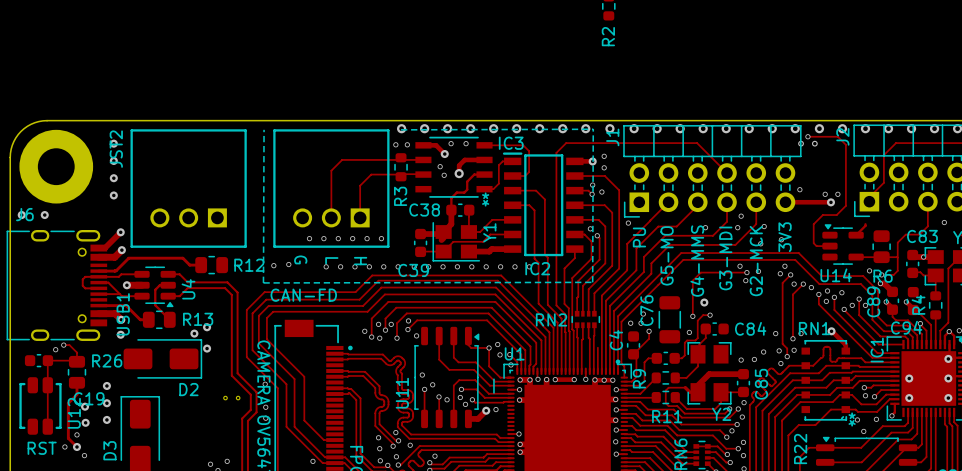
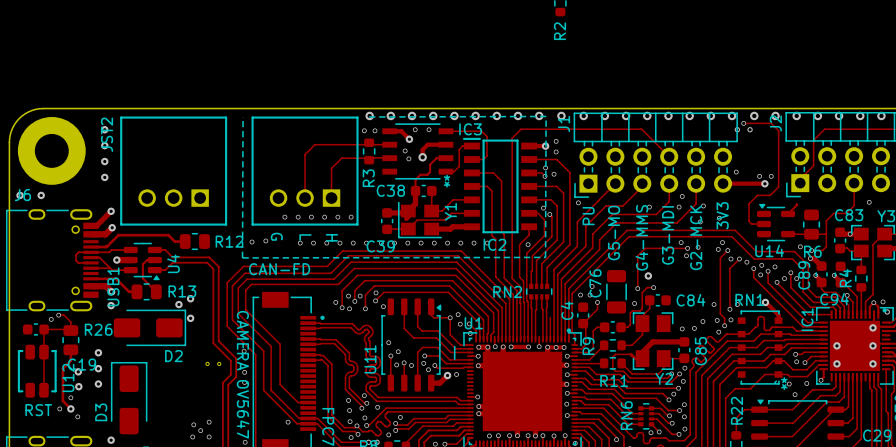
via: none -> (528, 244)
via: none -> (396, 364)

